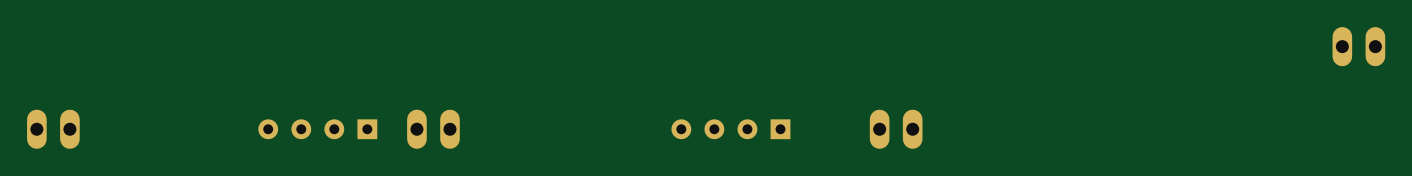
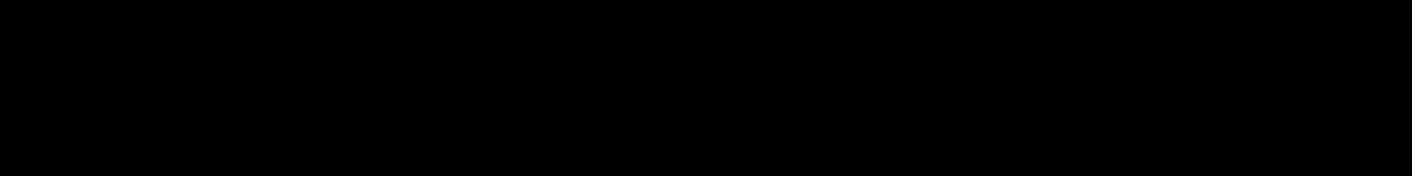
part: (1358, 46) -> none
part: (53, 129) -> none
part: (317, 129) -> none
part: (433, 129) -> none
part: (730, 129) -> none
part: (896, 129) -> none

